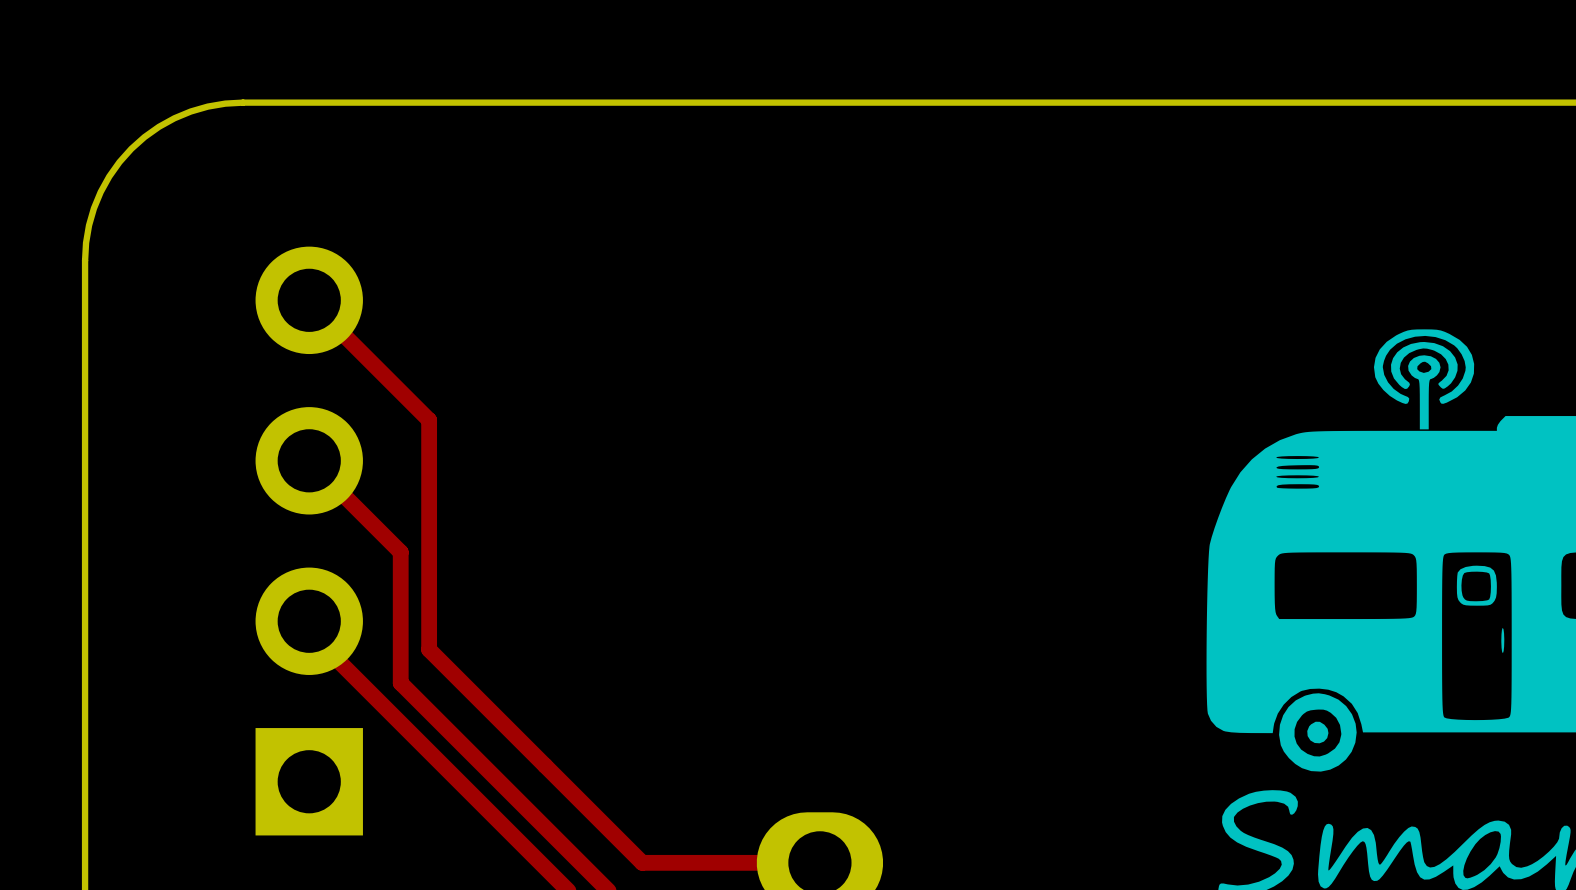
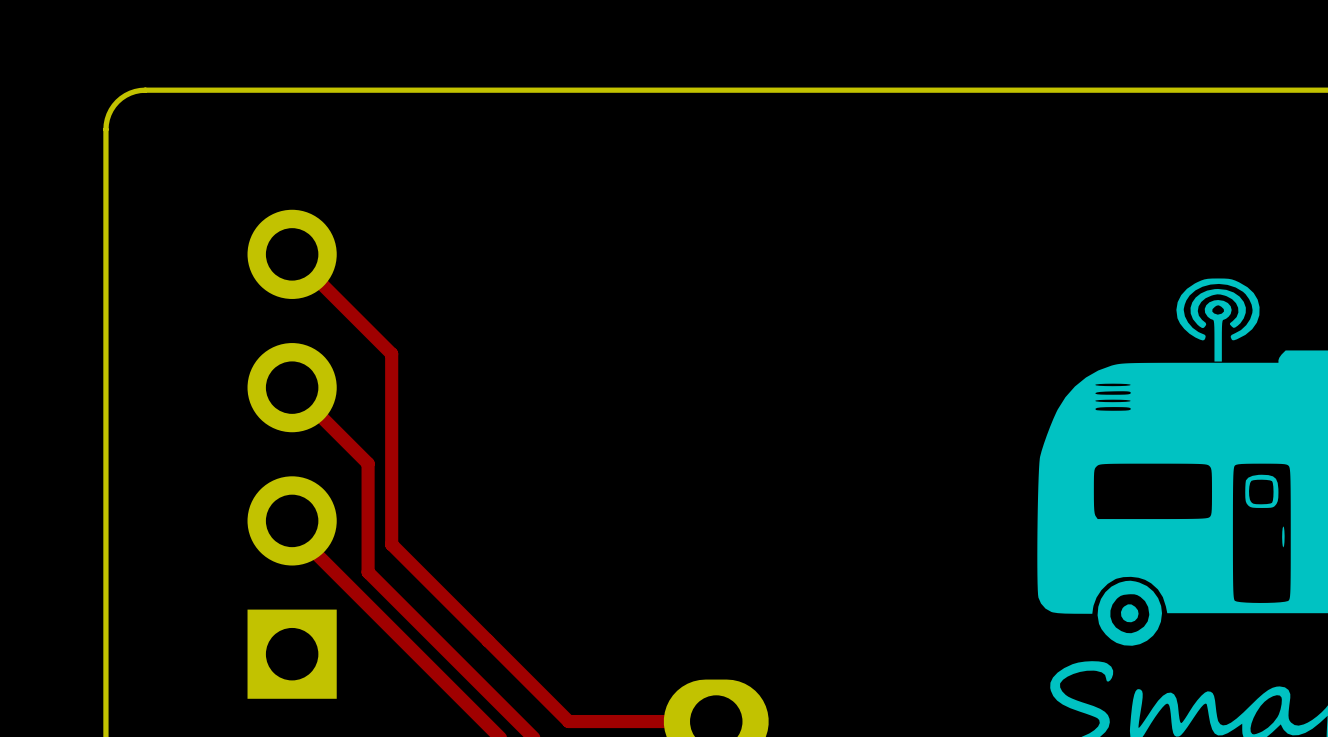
board edge: (243, 102) (207, 106) (174, 118) (144, 137) (131, 148) (109, 176) (100, 192) (89, 225) (85, 260) -> (237, 90) (140, 90) (125, 95) (117, 101) (108, 114) (106, 124) (105, 221)

